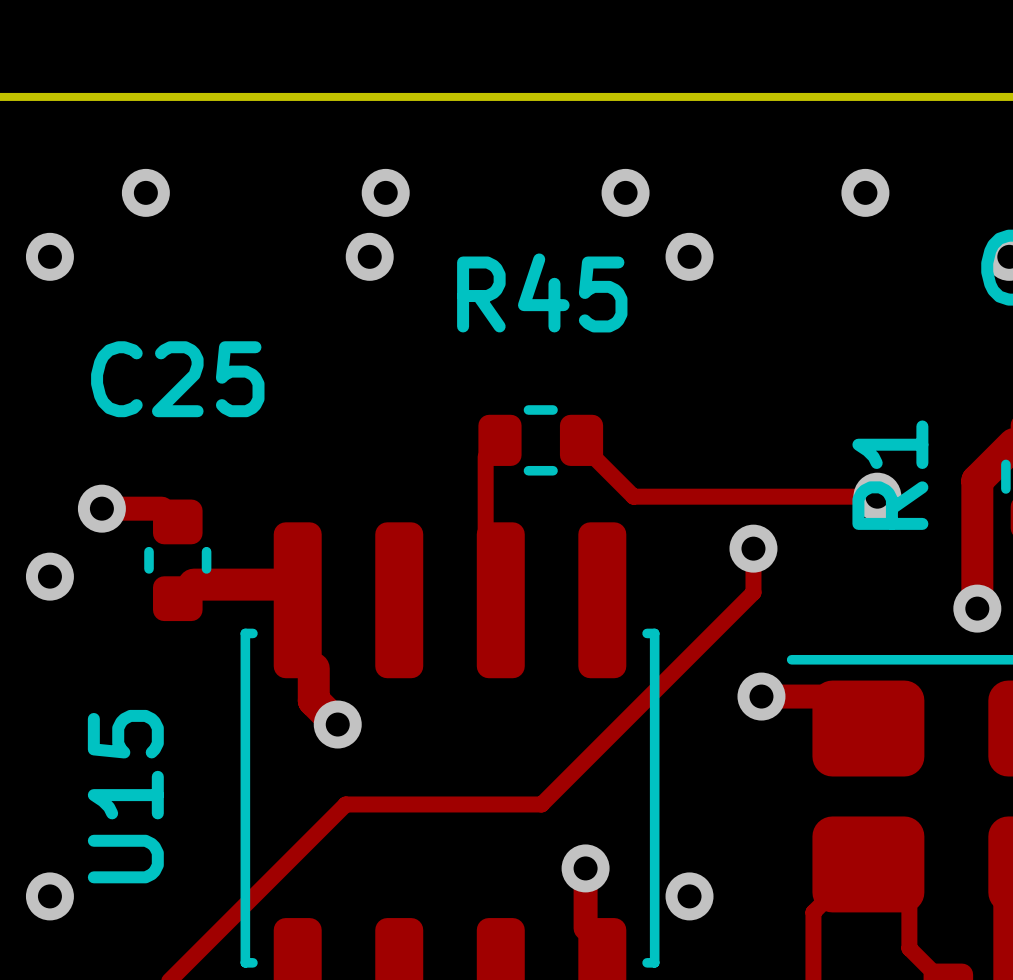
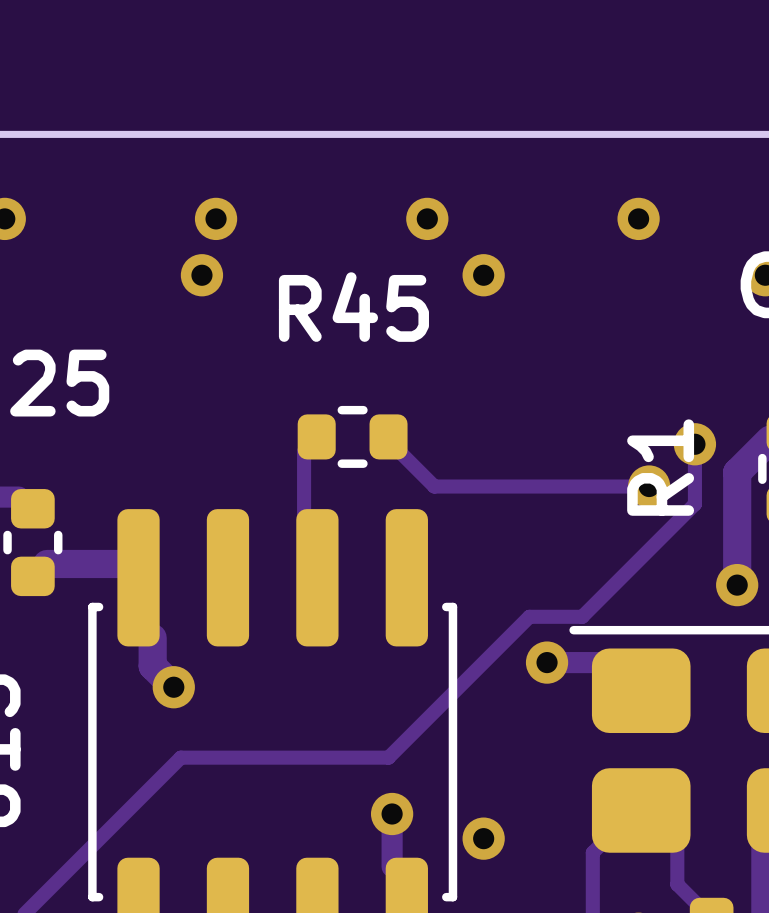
track: (753, 548) (753, 592) (541, 804) -> (694, 444) (694, 504) (582, 616) (529, 616) (388, 757) (353, 757)
via position: (753, 548) -> (694, 444)

